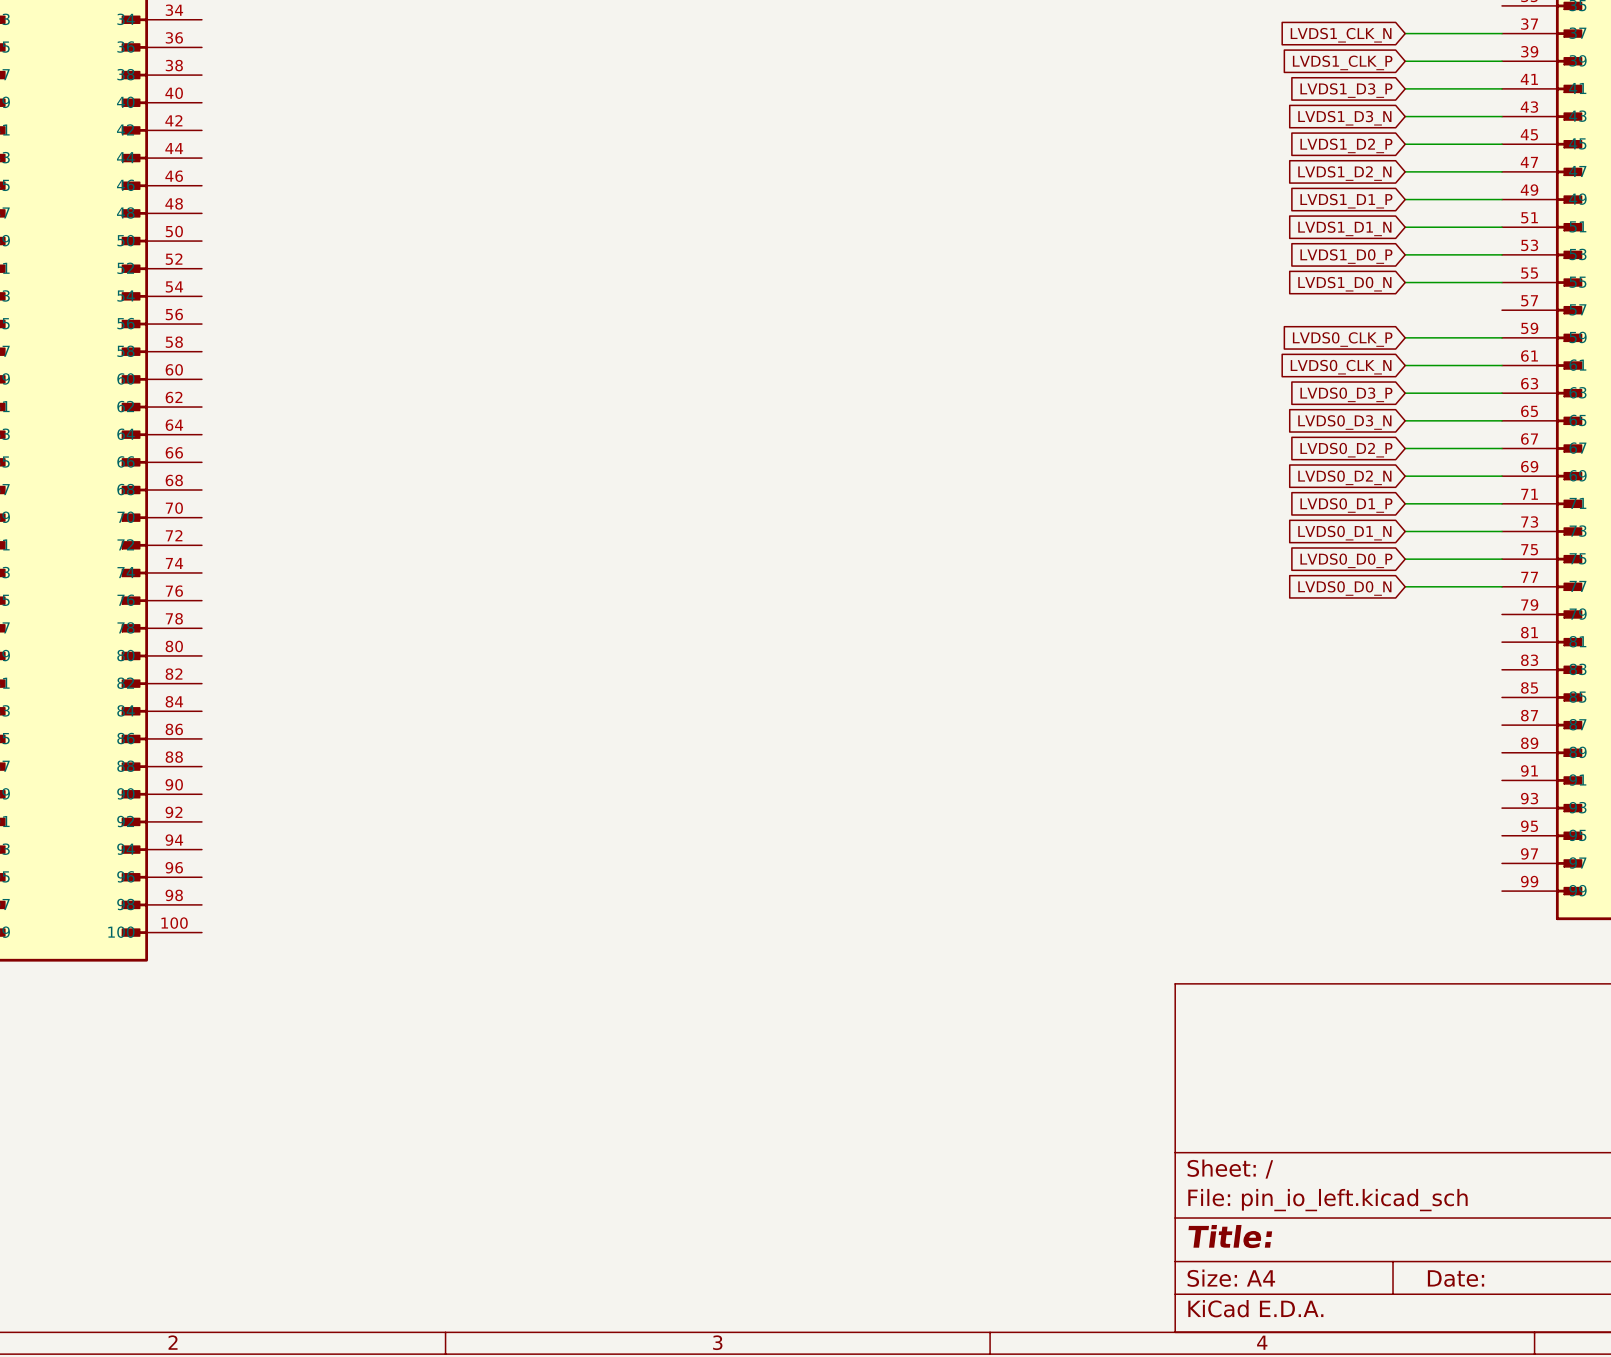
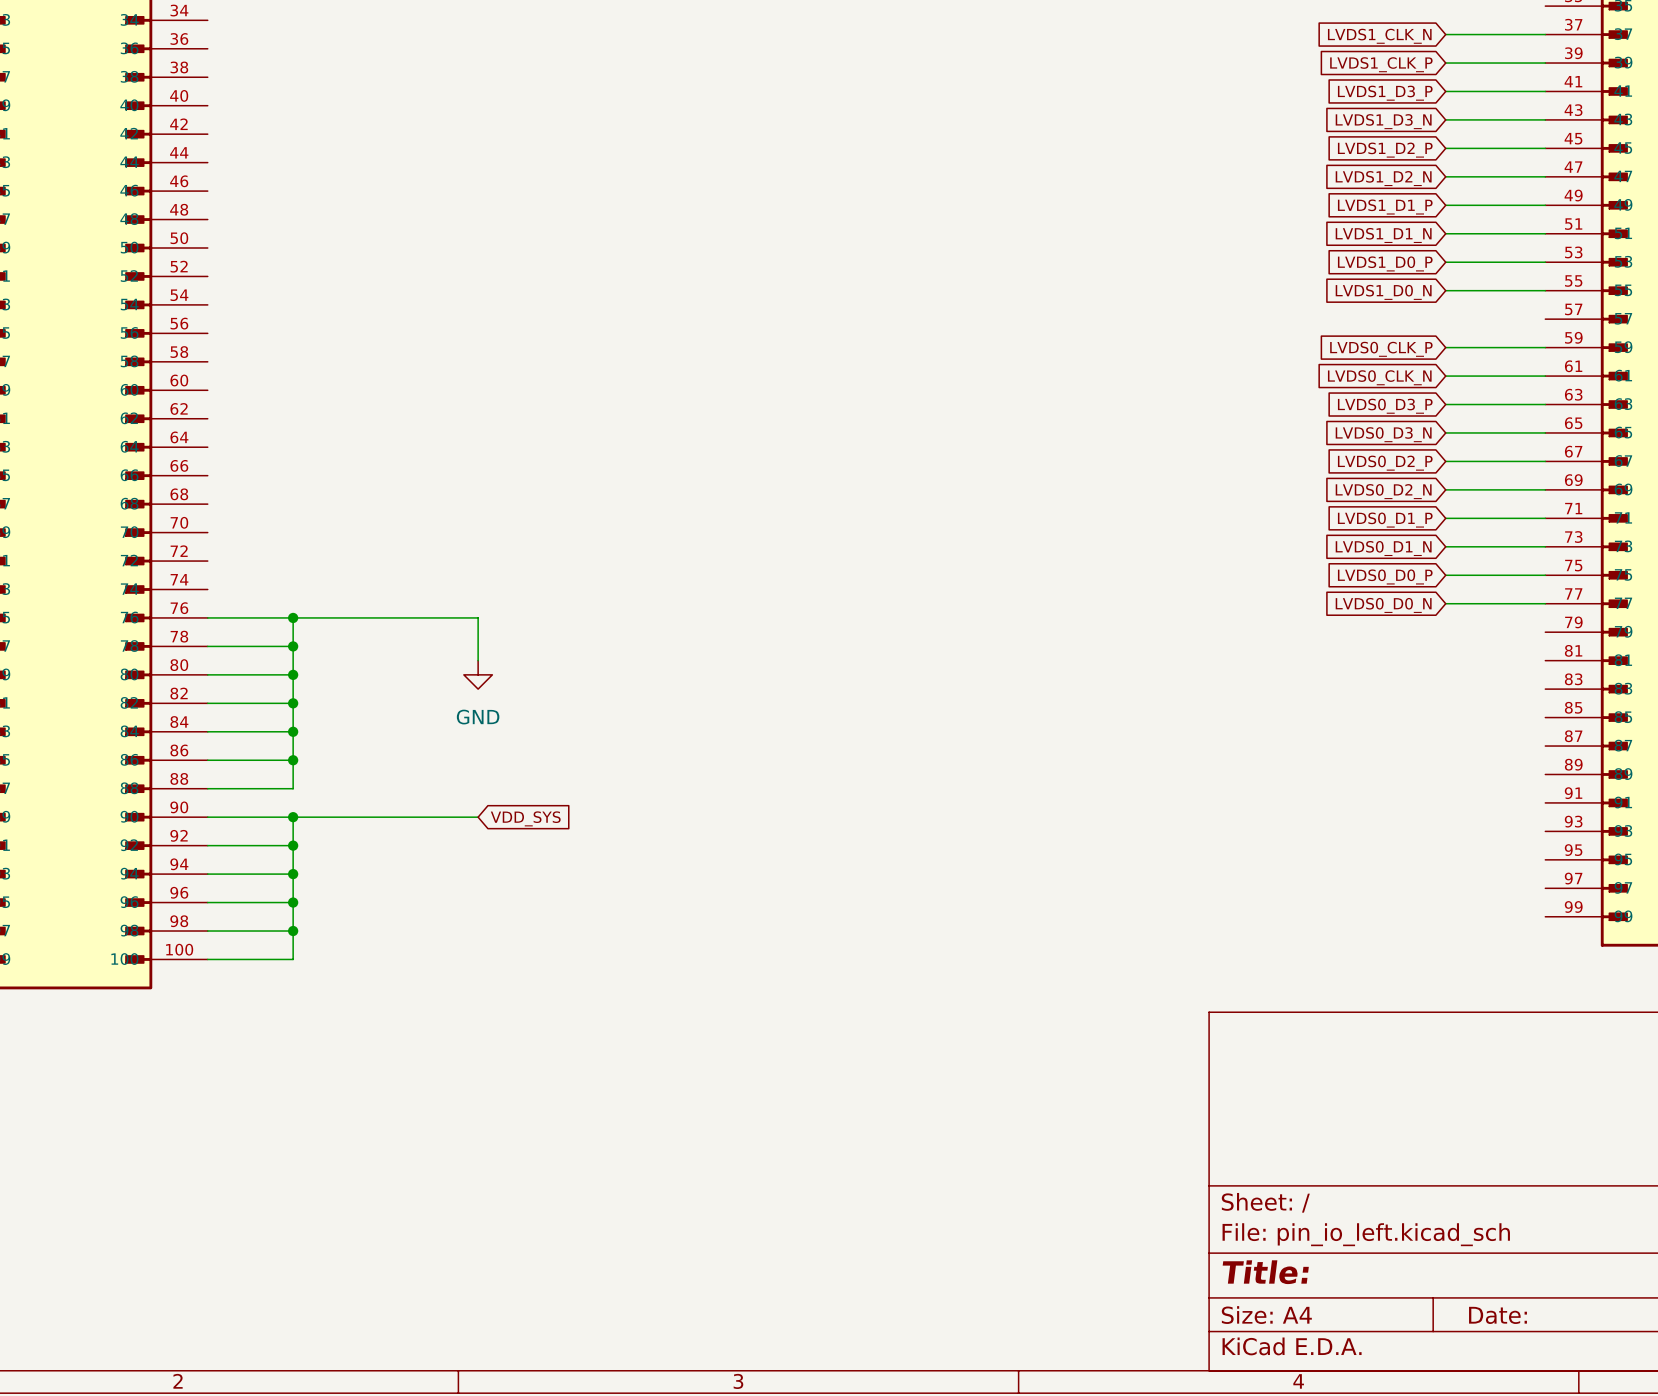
wire: none -> (207, 617) (478, 617) (478, 660)
wire: none -> (293, 617) (293, 788) (207, 788)
junction: none -> (293, 617)
wire: none -> (207, 646) (293, 646)
junction: none -> (293, 646)
wire: none -> (207, 674) (293, 674)
junction: none -> (293, 674)
power symbol: none -> GND (478, 674)
wire: none -> (207, 703) (293, 703)
junction: none -> (293, 703)
wire: none -> (207, 731) (293, 731)
junction: none -> (293, 731)
wire: none -> (207, 760) (293, 760)
junction: none -> (293, 760)
wire: none -> (207, 817) (478, 817)
wire: none -> (293, 817) (293, 959) (207, 959)
junction: none -> (293, 817)
global label: none -> VDD_SYS (525, 818)
wire: none -> (207, 845) (293, 845)
junction: none -> (293, 845)
wire: none -> (207, 874) (293, 874)
junction: none -> (293, 874)
wire: none -> (207, 902) (293, 902)
junction: none -> (293, 902)
wire: none -> (207, 931) (293, 931)
junction: none -> (293, 931)

